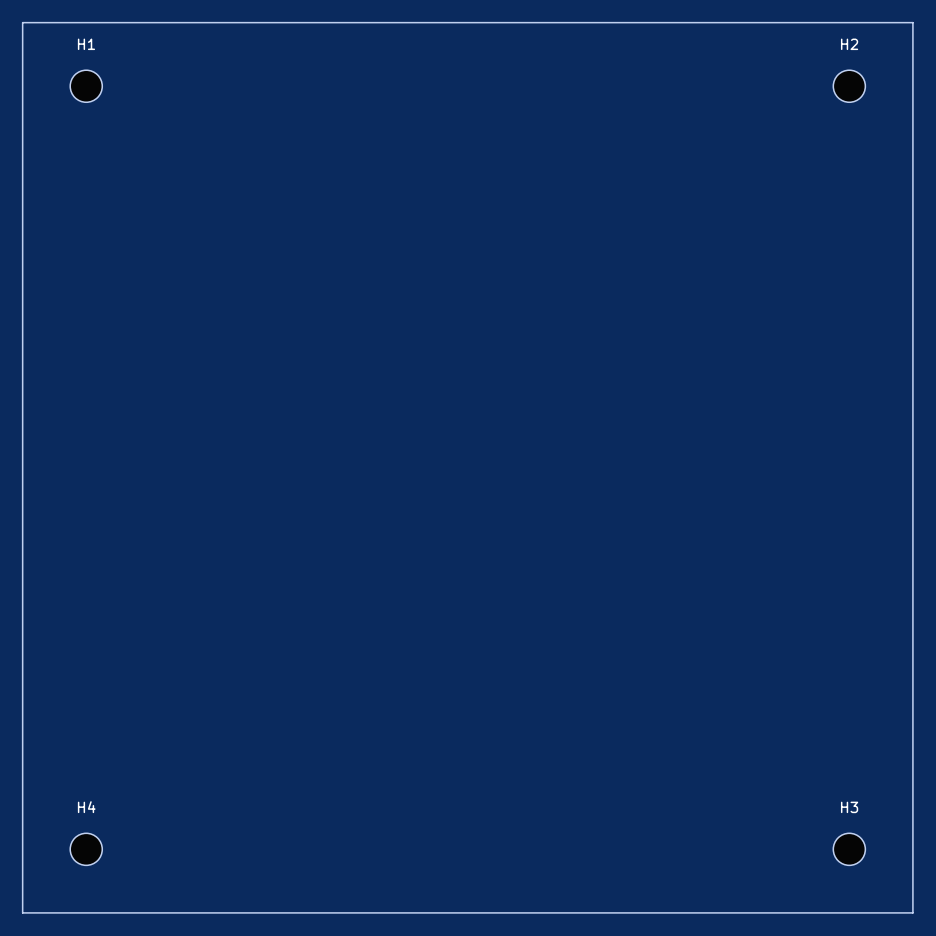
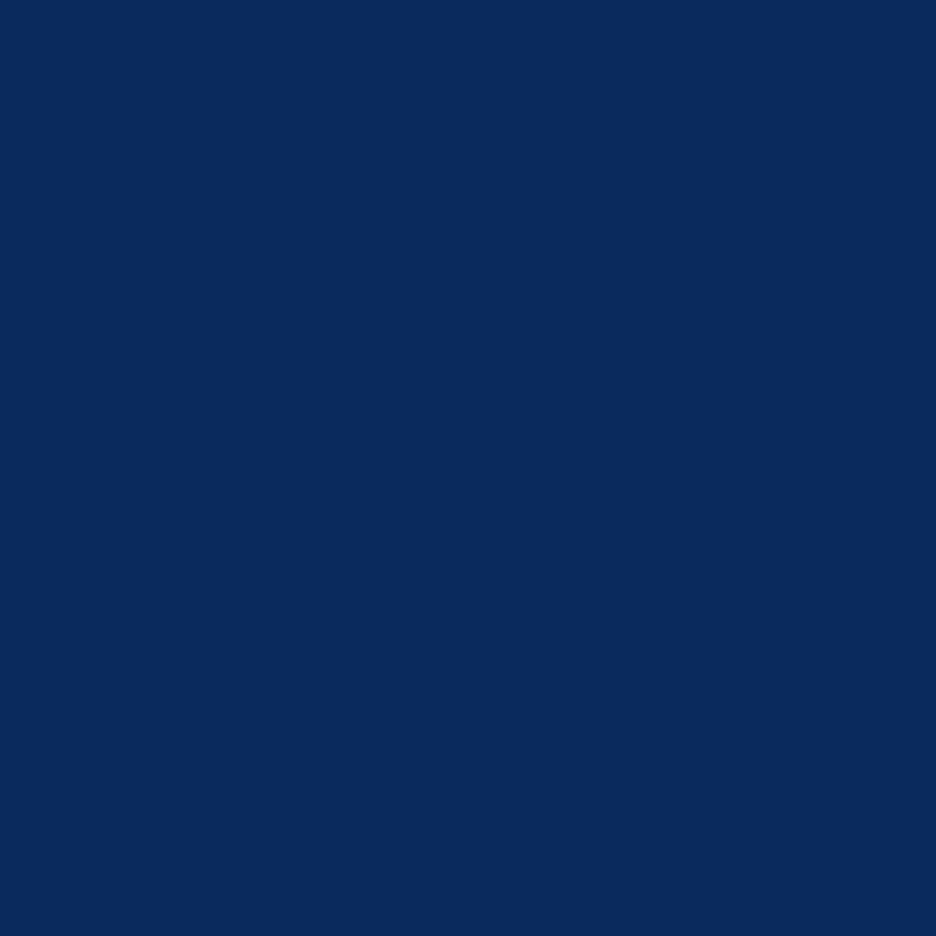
board edge: (22, 22) (912, 22) (912, 912) (22, 912) (22, 22) -> none
H1: (86, 86) -> none
H2: (849, 86) -> none
H4: (86, 849) -> none
H3: (849, 849) -> none

